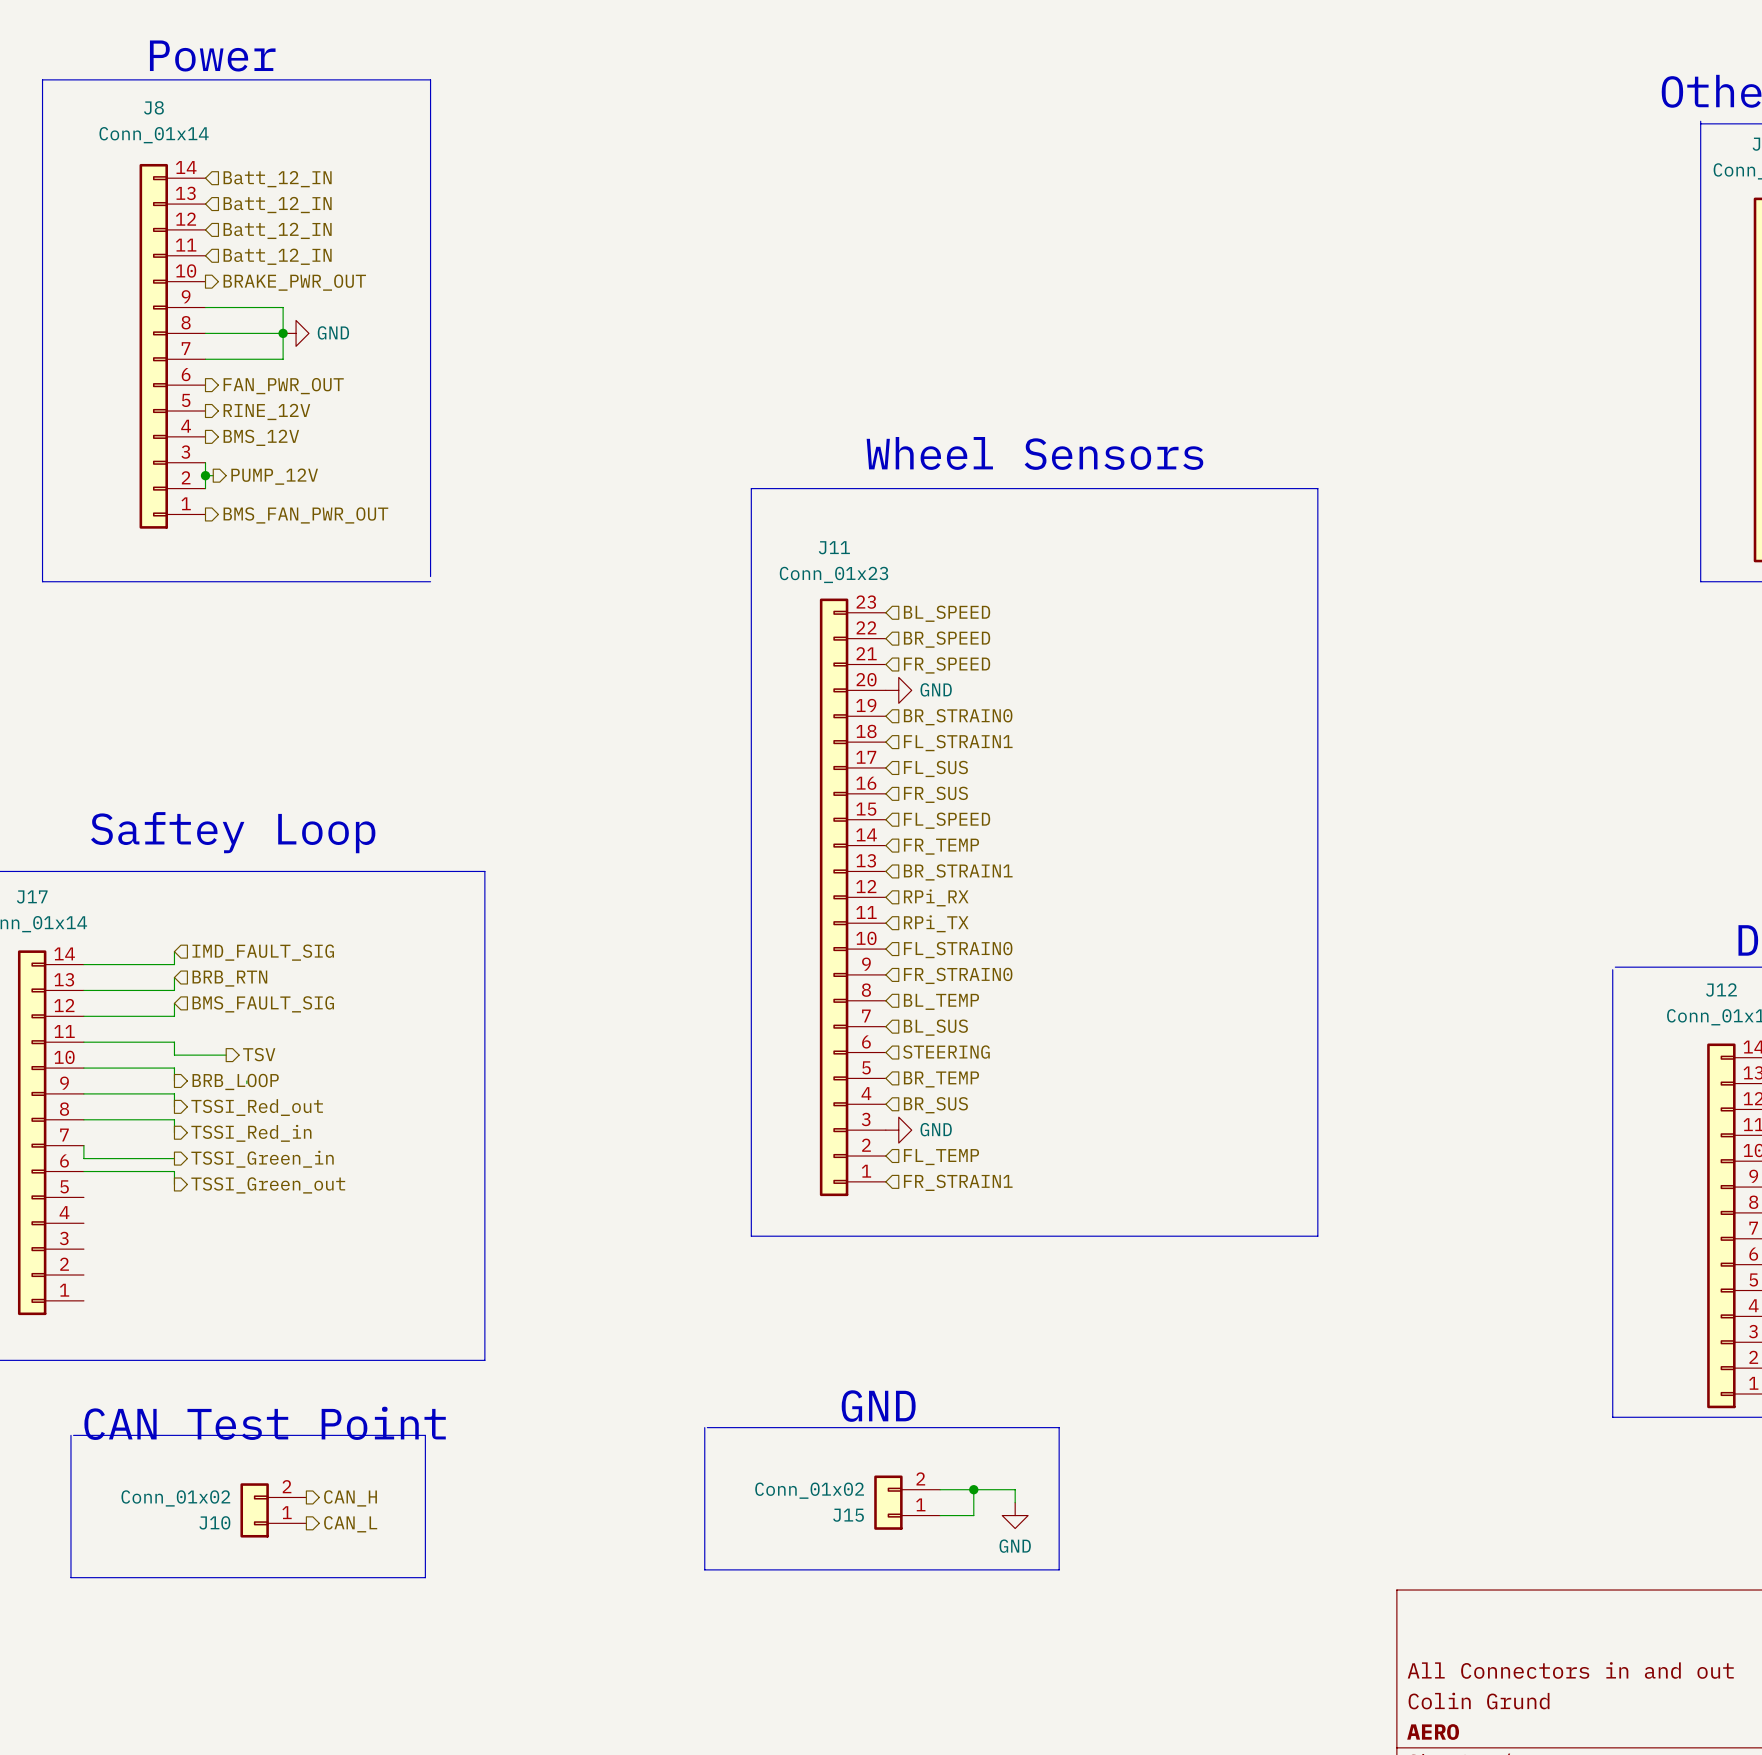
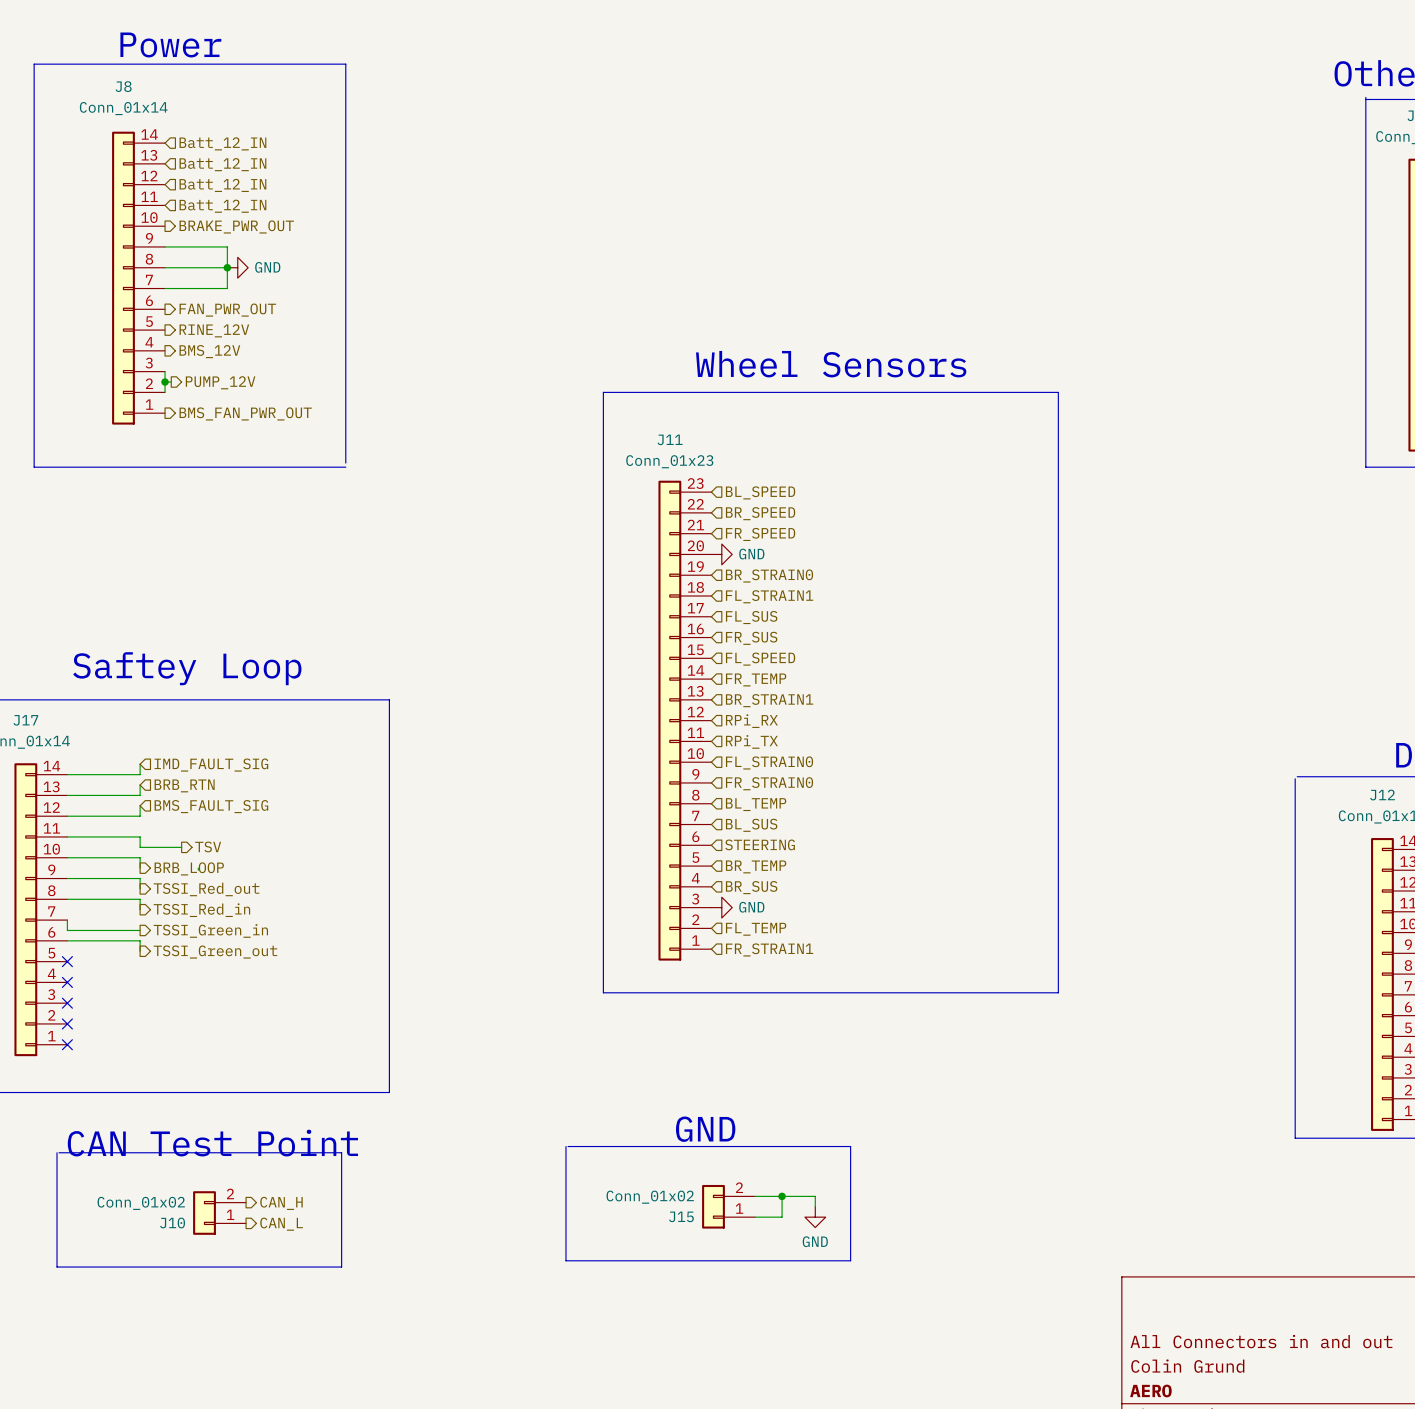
no-connect mark: none -> (67, 961)
no-connect mark: none -> (67, 982)
no-connect mark: none -> (67, 1003)
no-connect mark: none -> (67, 1023)
no-connect mark: none -> (67, 1044)

